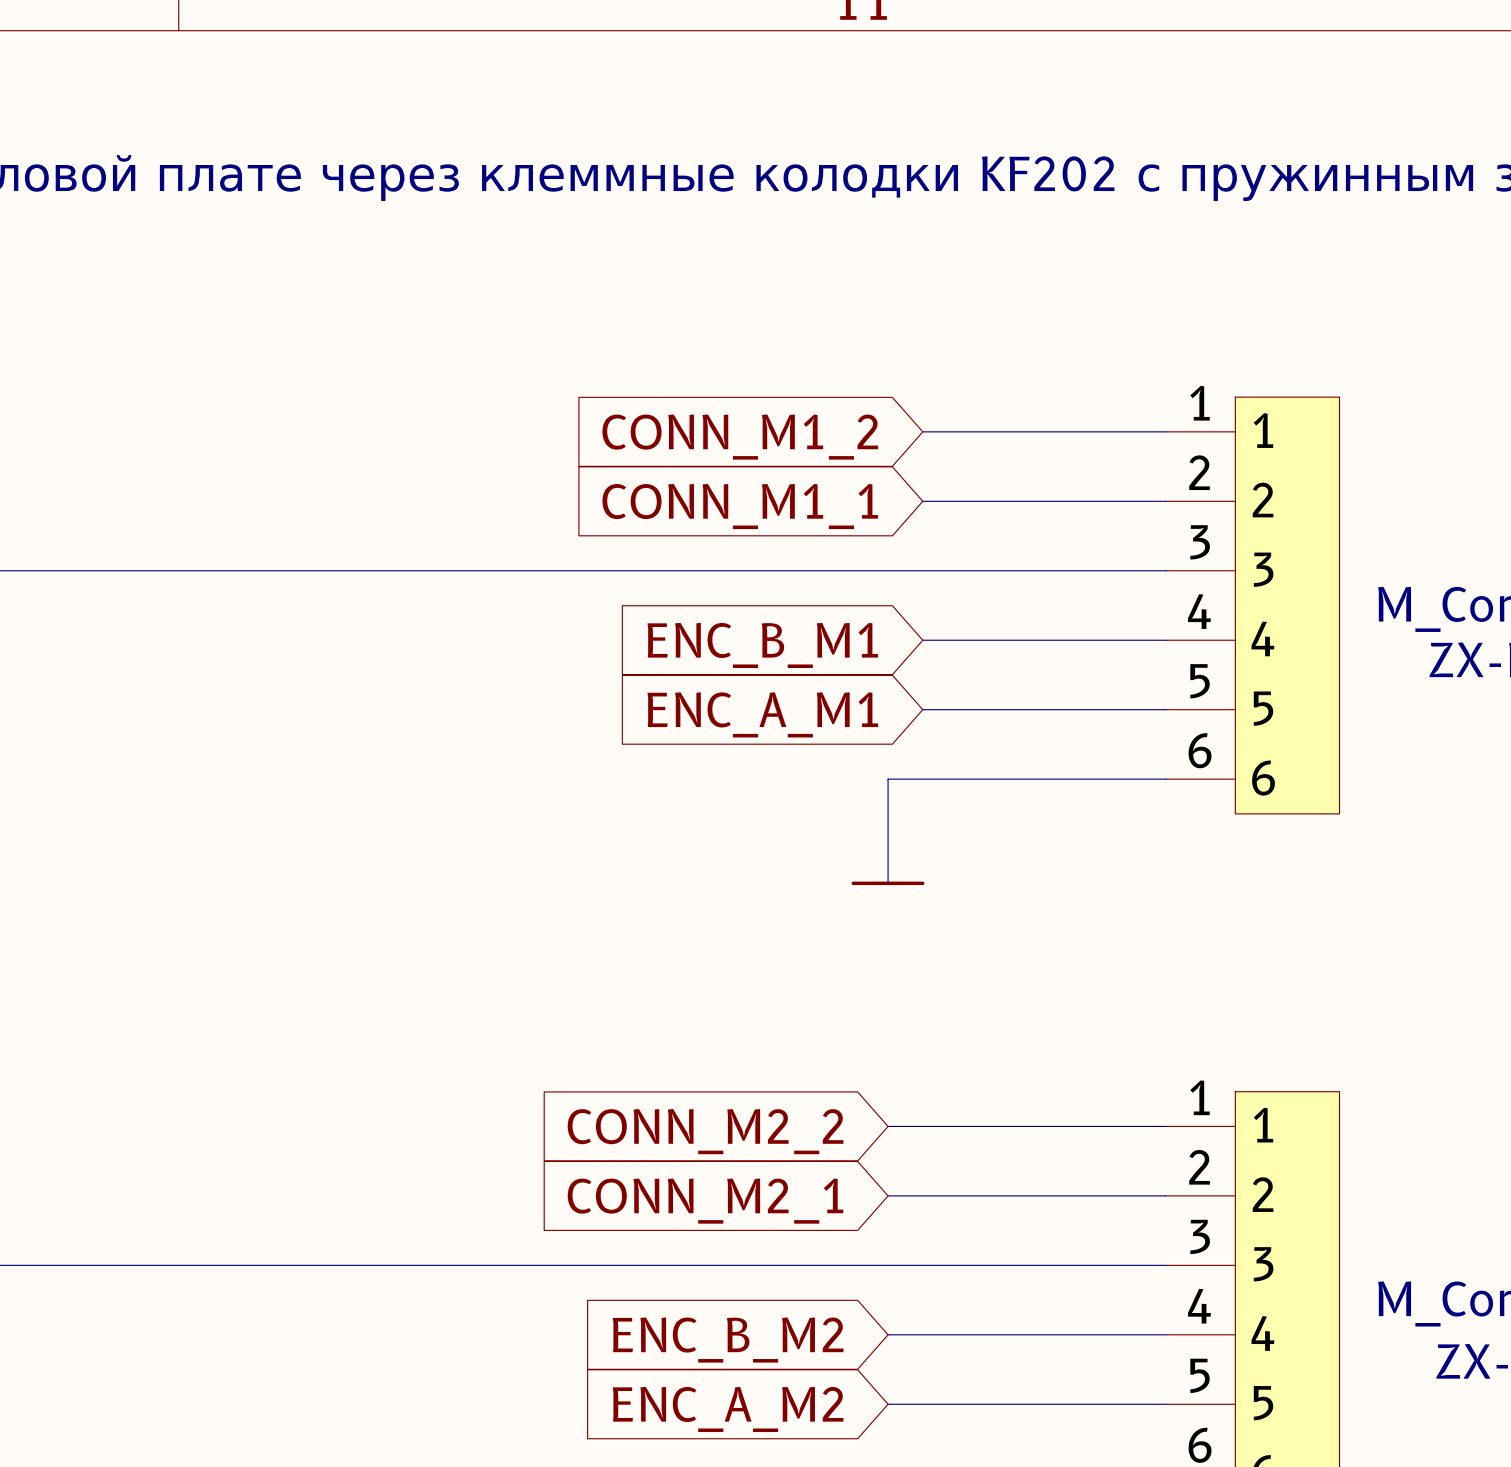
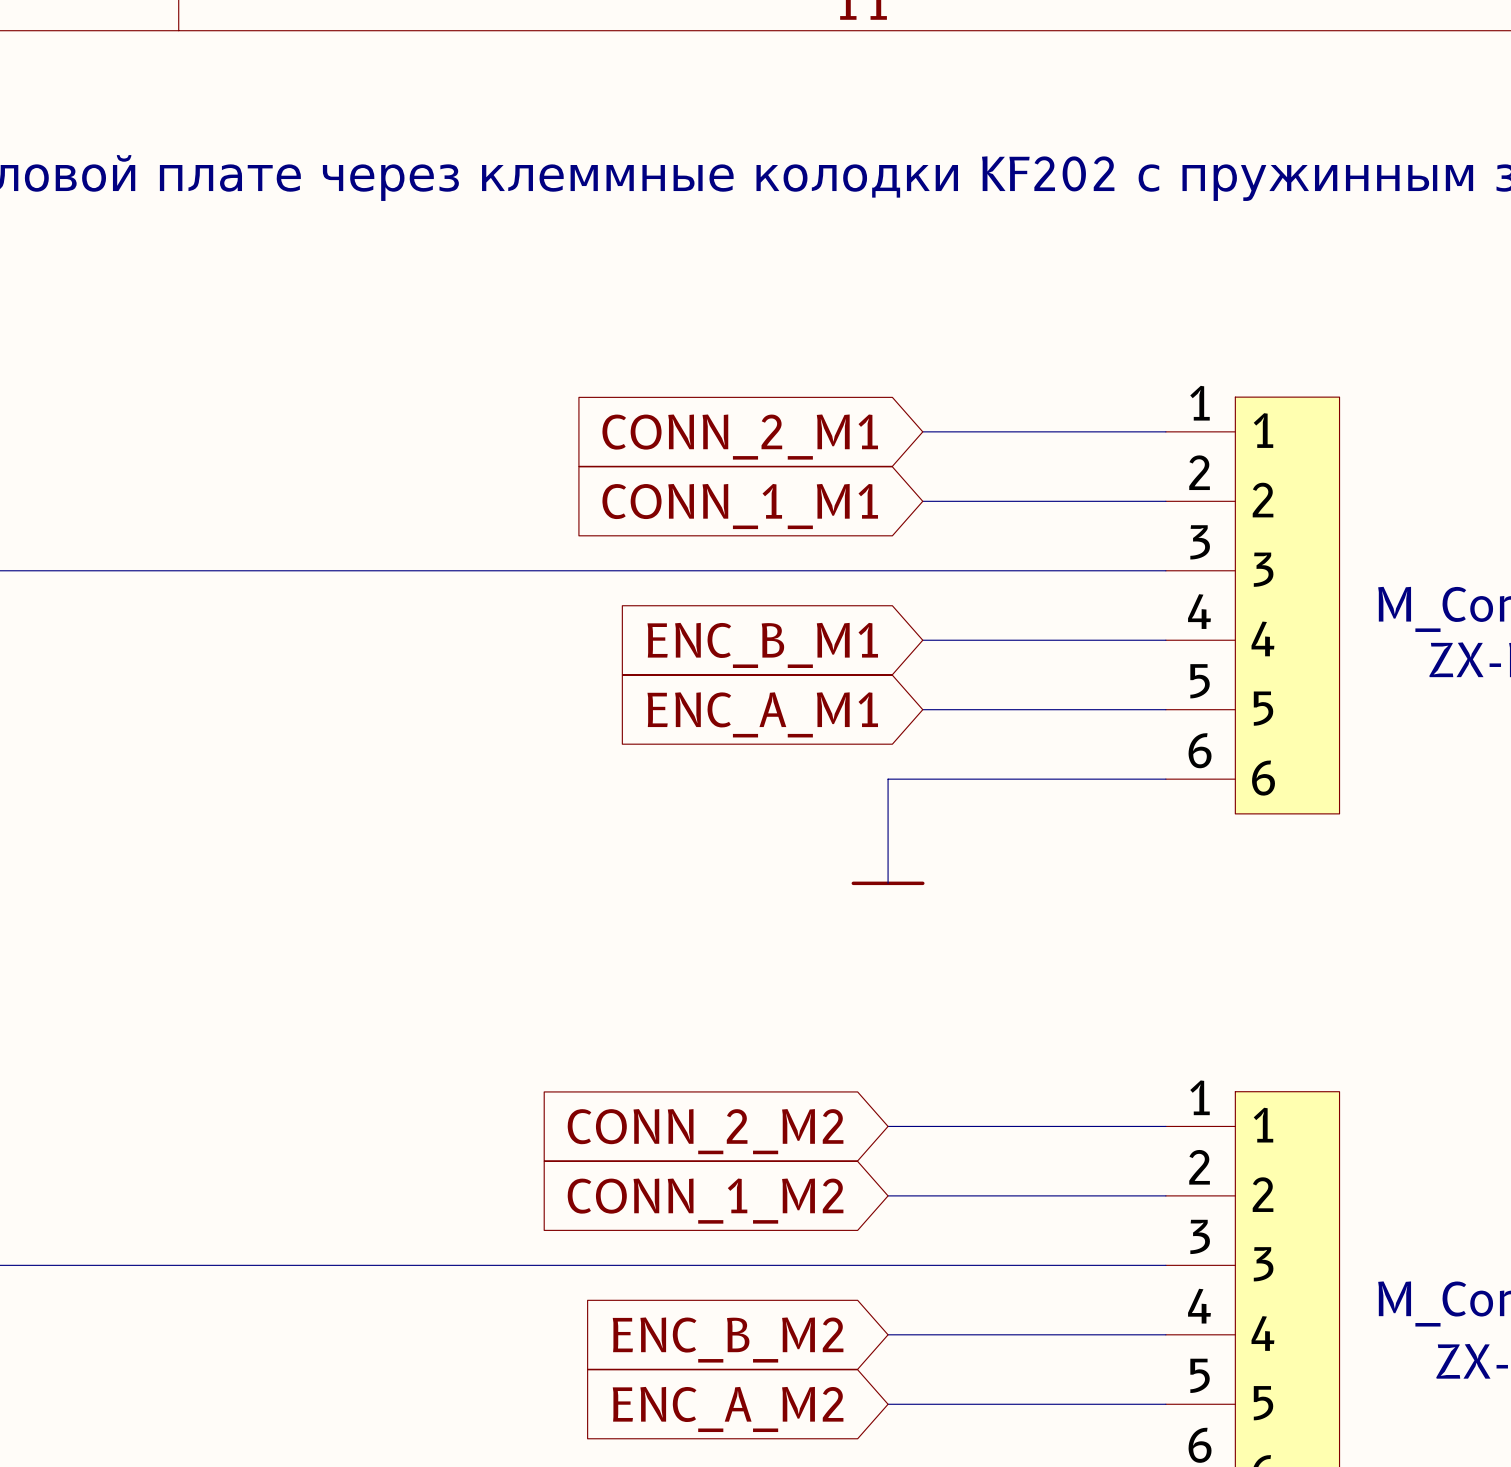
global label: CONN_M1_2 (740, 437) -> CONN_2_M1 (740, 437)
global label: CONN_M1_1 (740, 506) -> CONN_1_M1 (740, 506)
global label: CONN_M2_2 (705, 1131) -> CONN_2_M2 (705, 1131)
global label: CONN_M2_1 (705, 1201) -> CONN_1_M2 (705, 1201)

